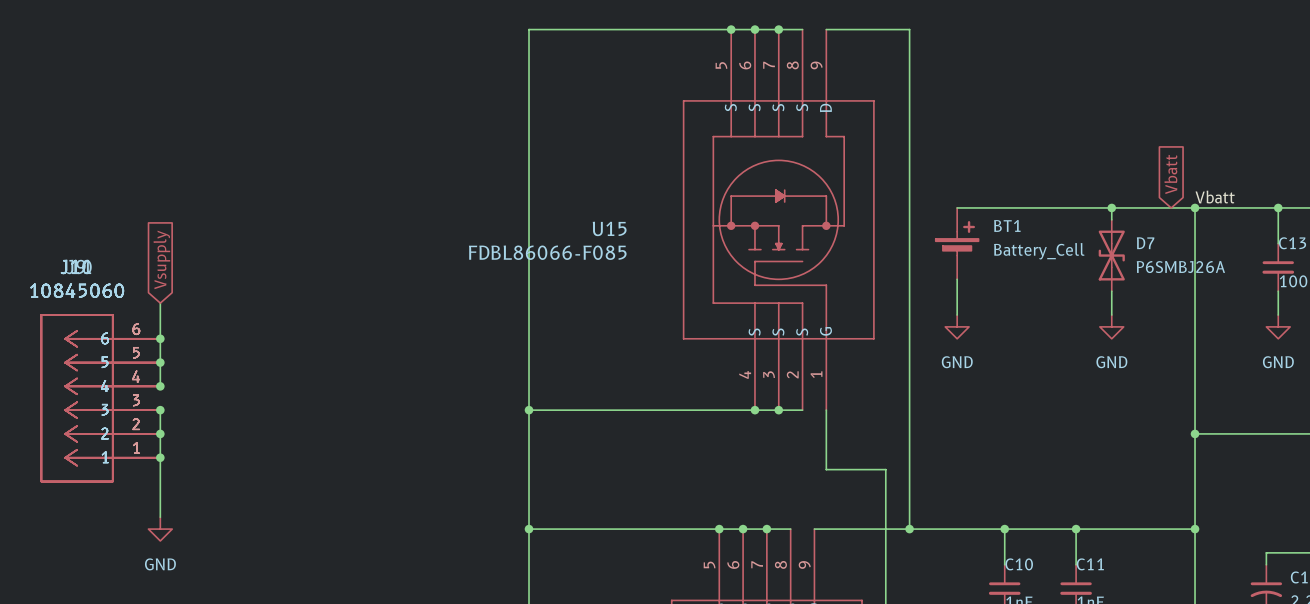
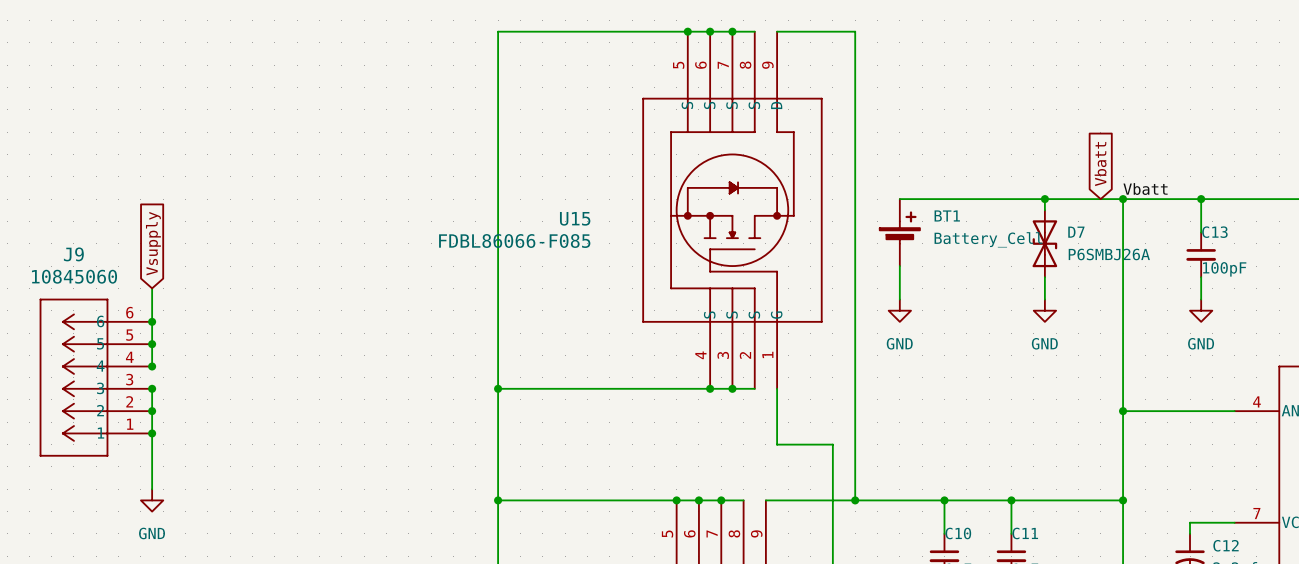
part: 10845060 (100, 398) -> none
part: 10845060 (100, 398) -> none

